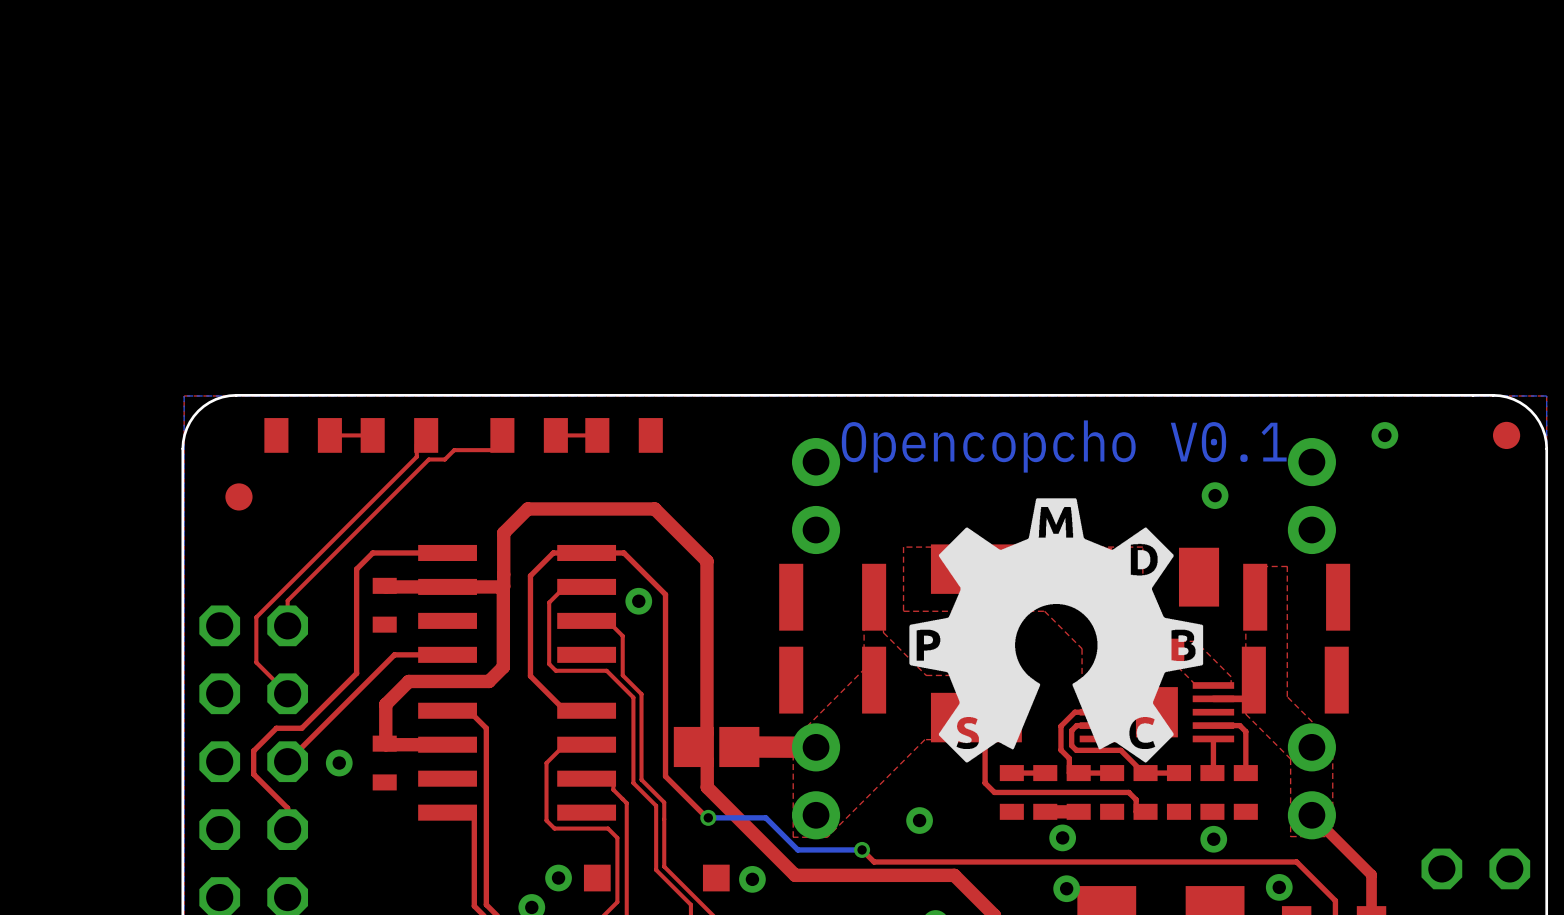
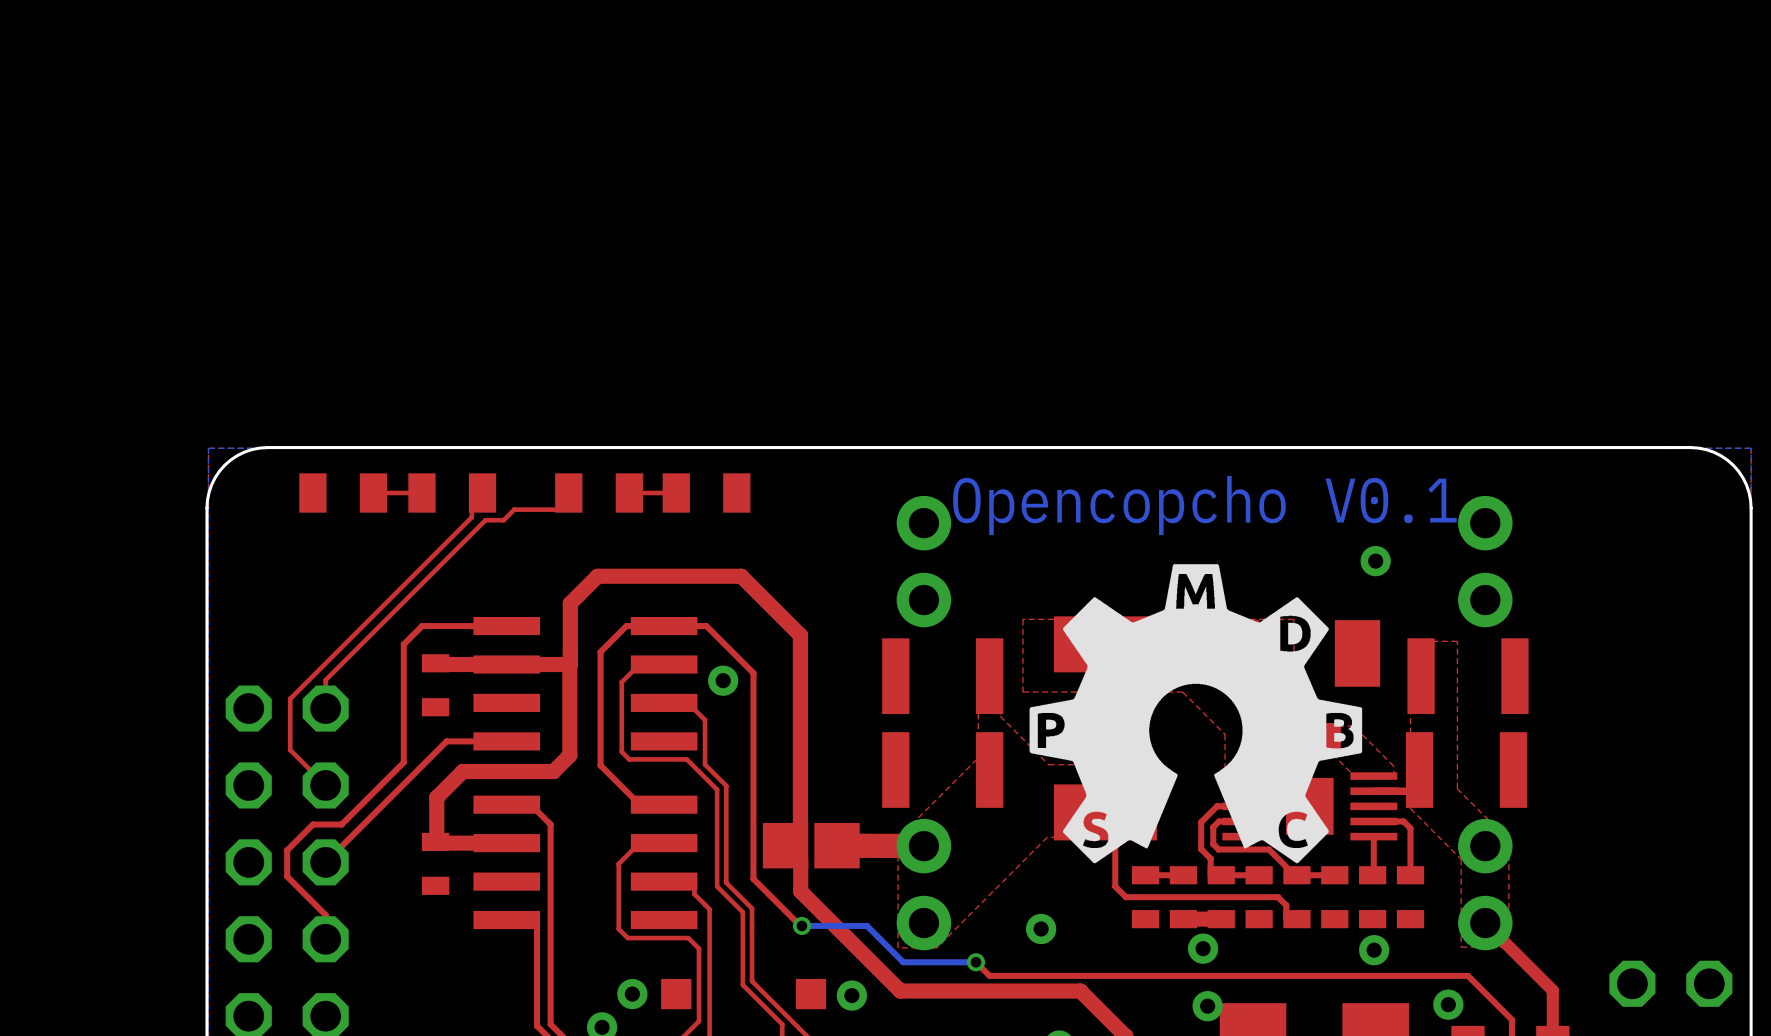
via: (1384, 435) -> none
part: (1506, 435) -> none
part: (238, 496) -> none
via: (339, 763) -> none

